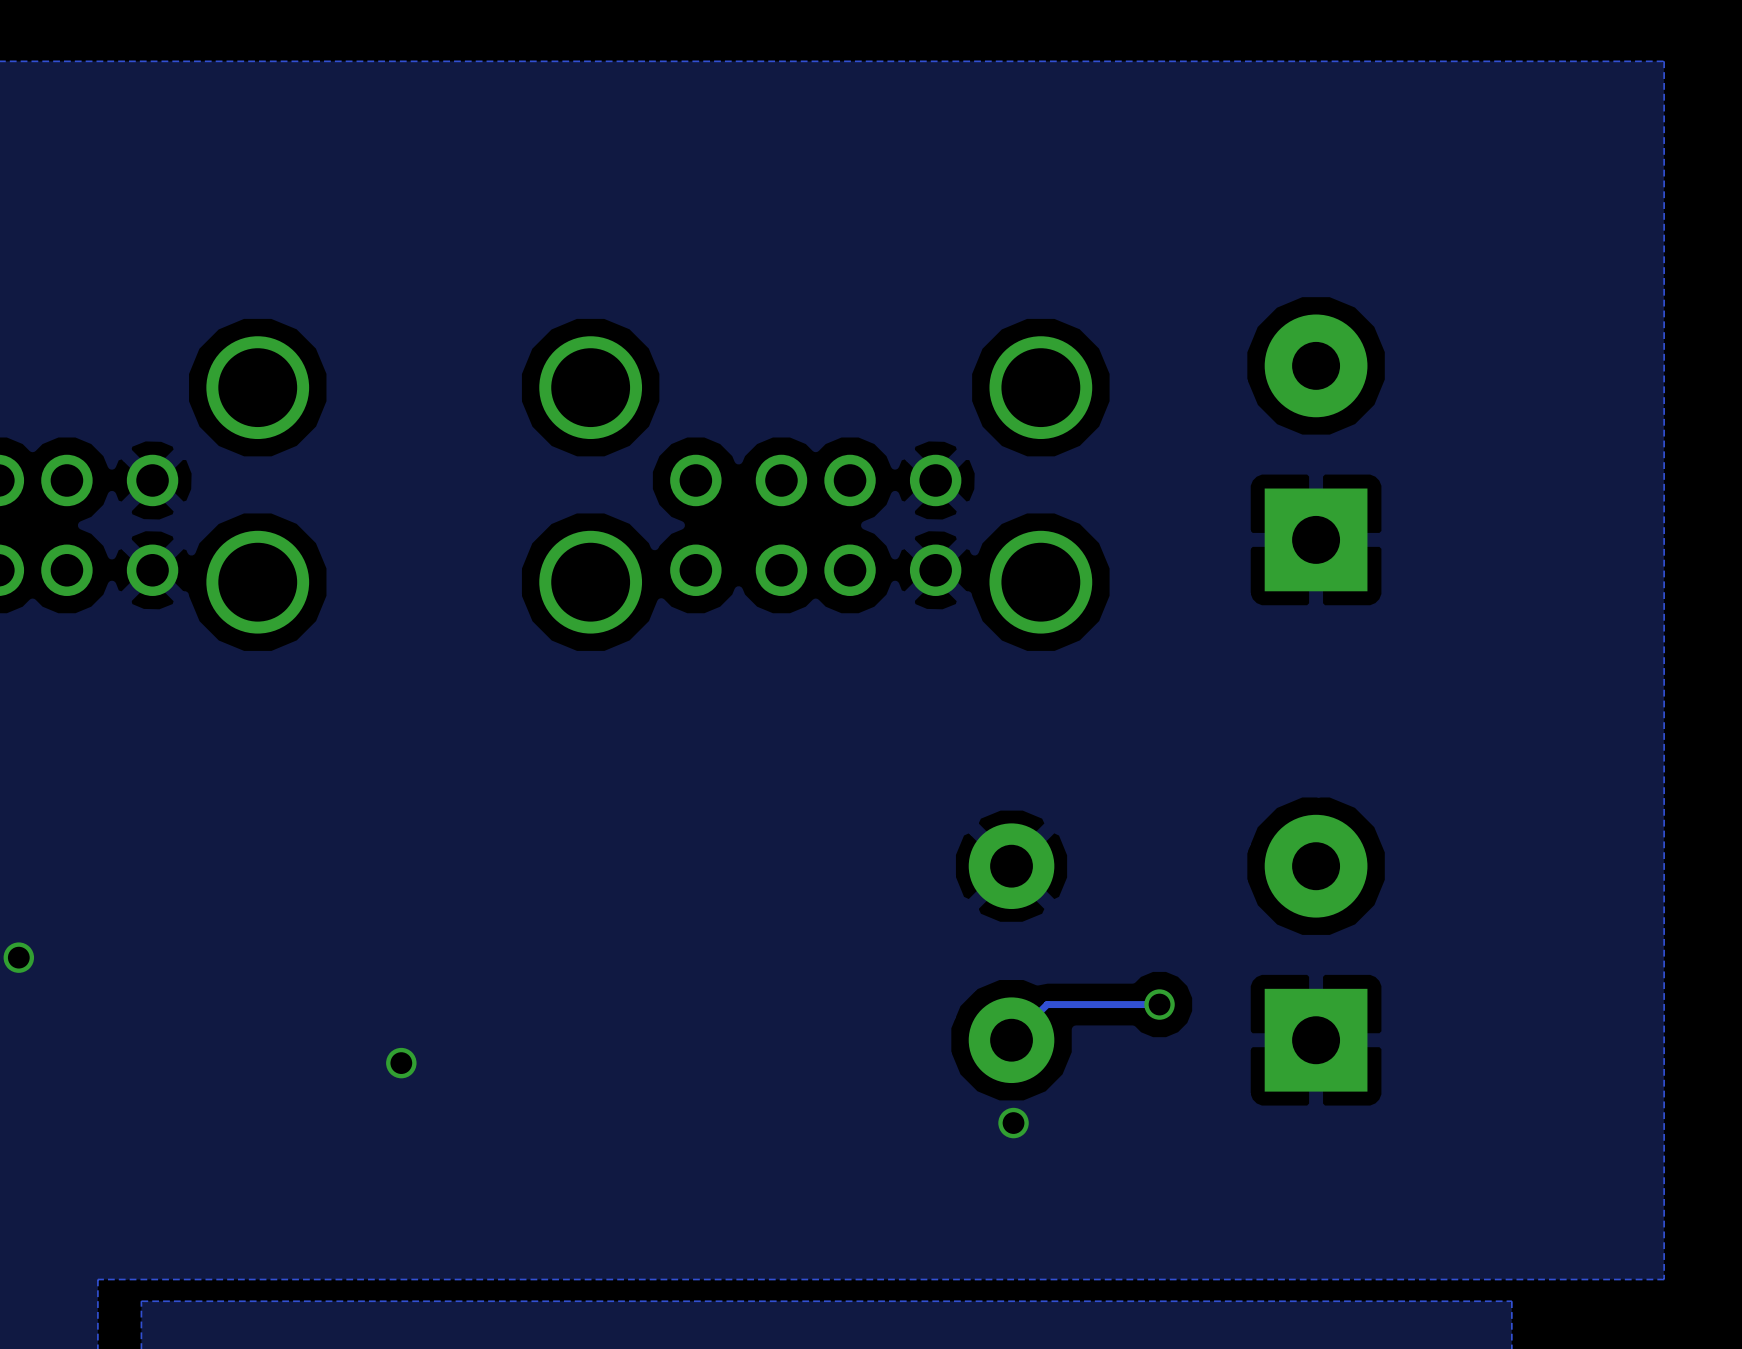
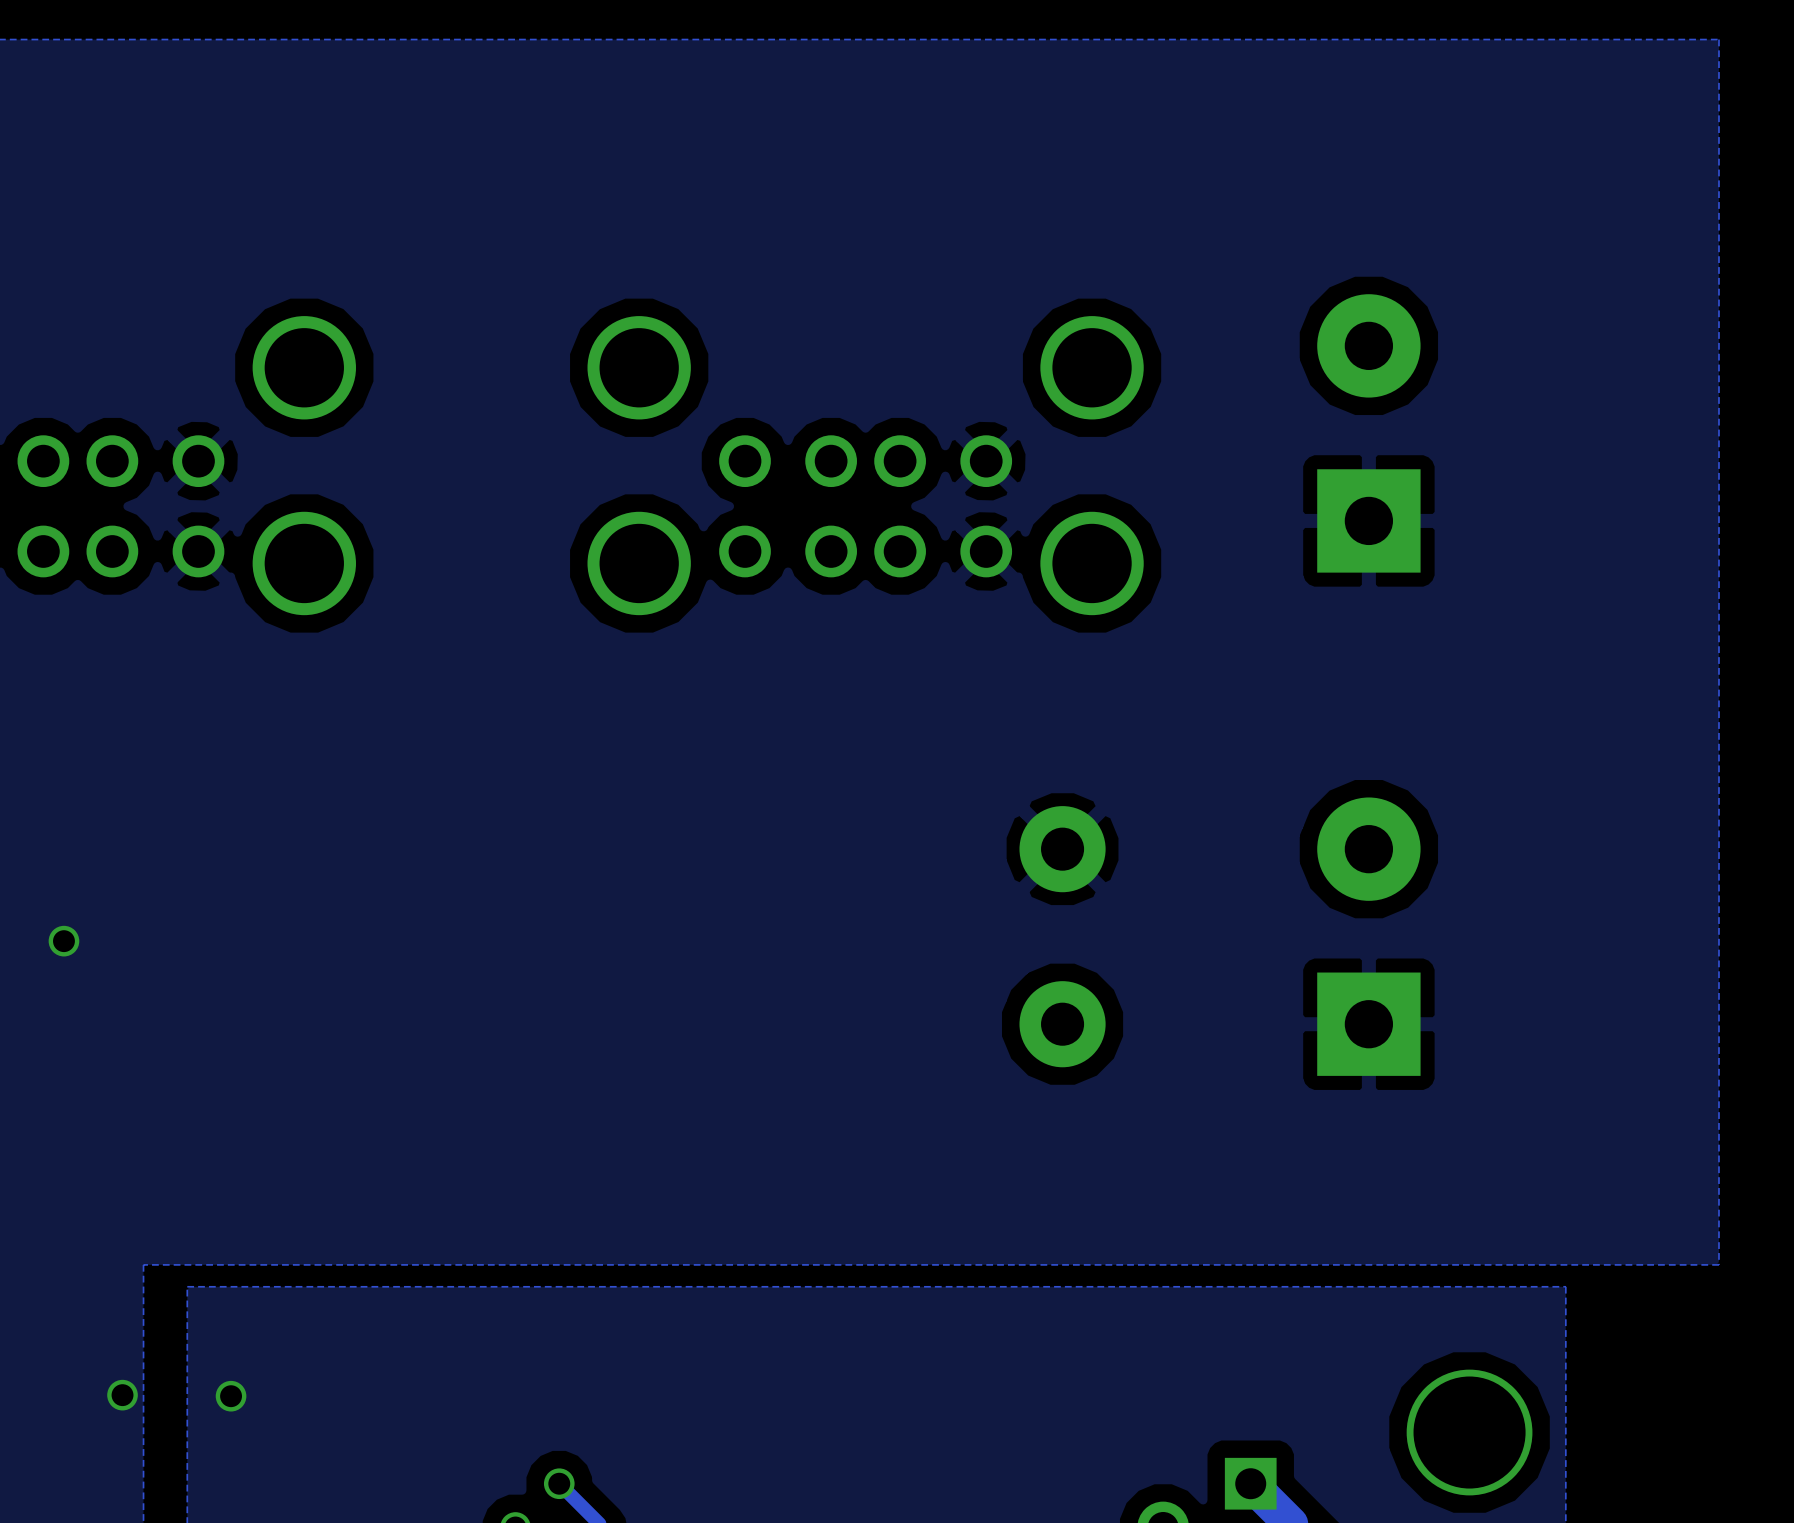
track: (1159, 1004) (1047, 1004) (1011, 1040) -> none
via: (1159, 1004) -> none
via: (401, 1063) -> none
via: (1013, 1123) -> none

